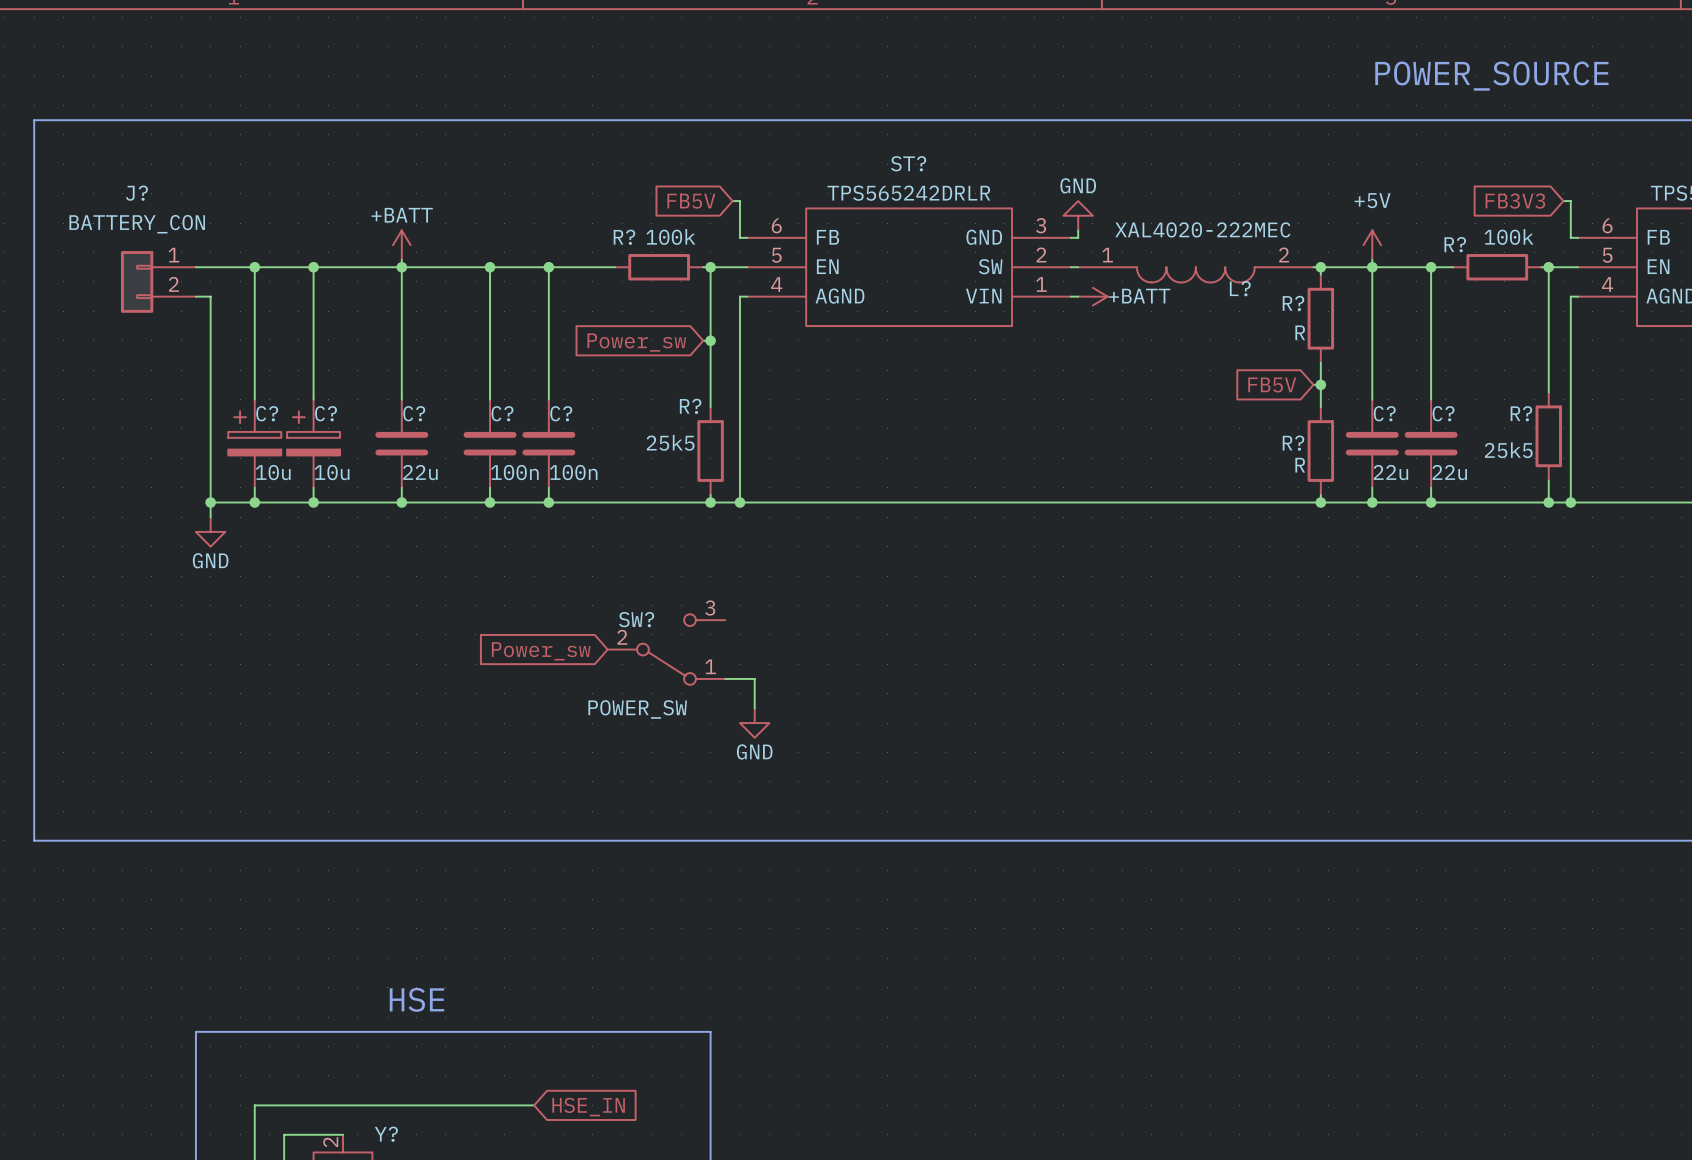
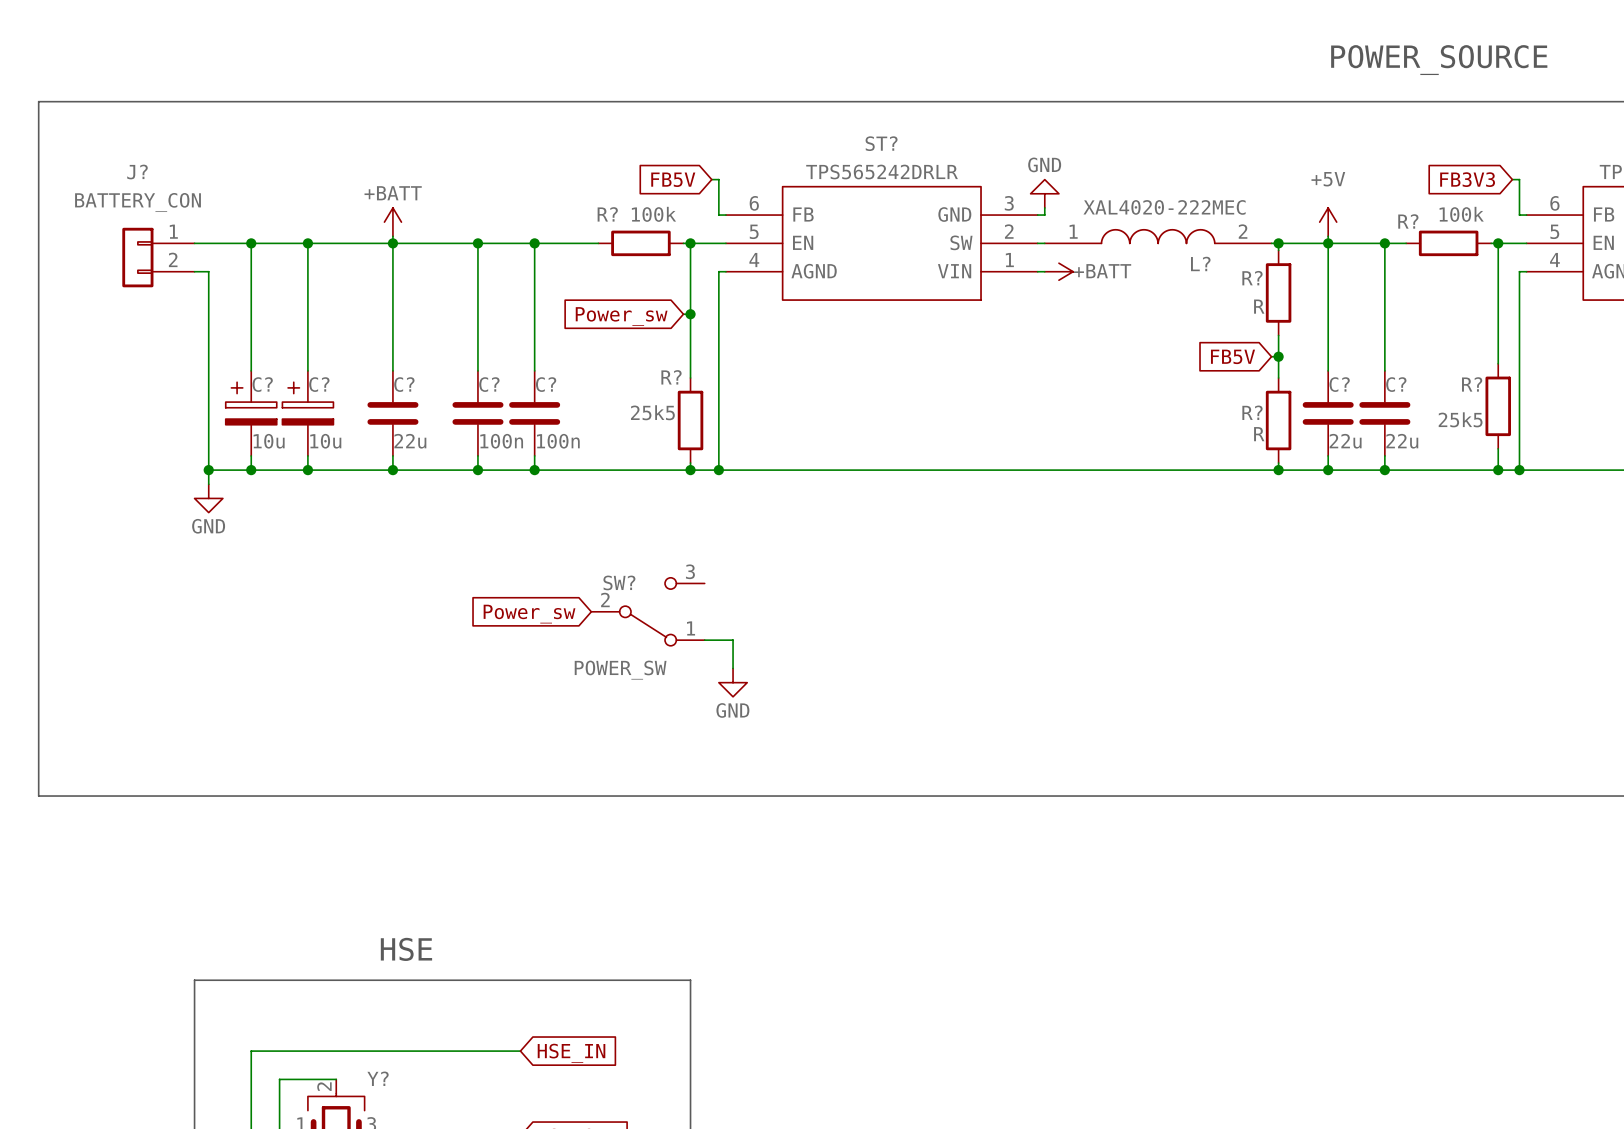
L?: none -> XAL4020-222MEC (1158, 236)
L?: XAL4020-222MEC (1195, 274) -> none

